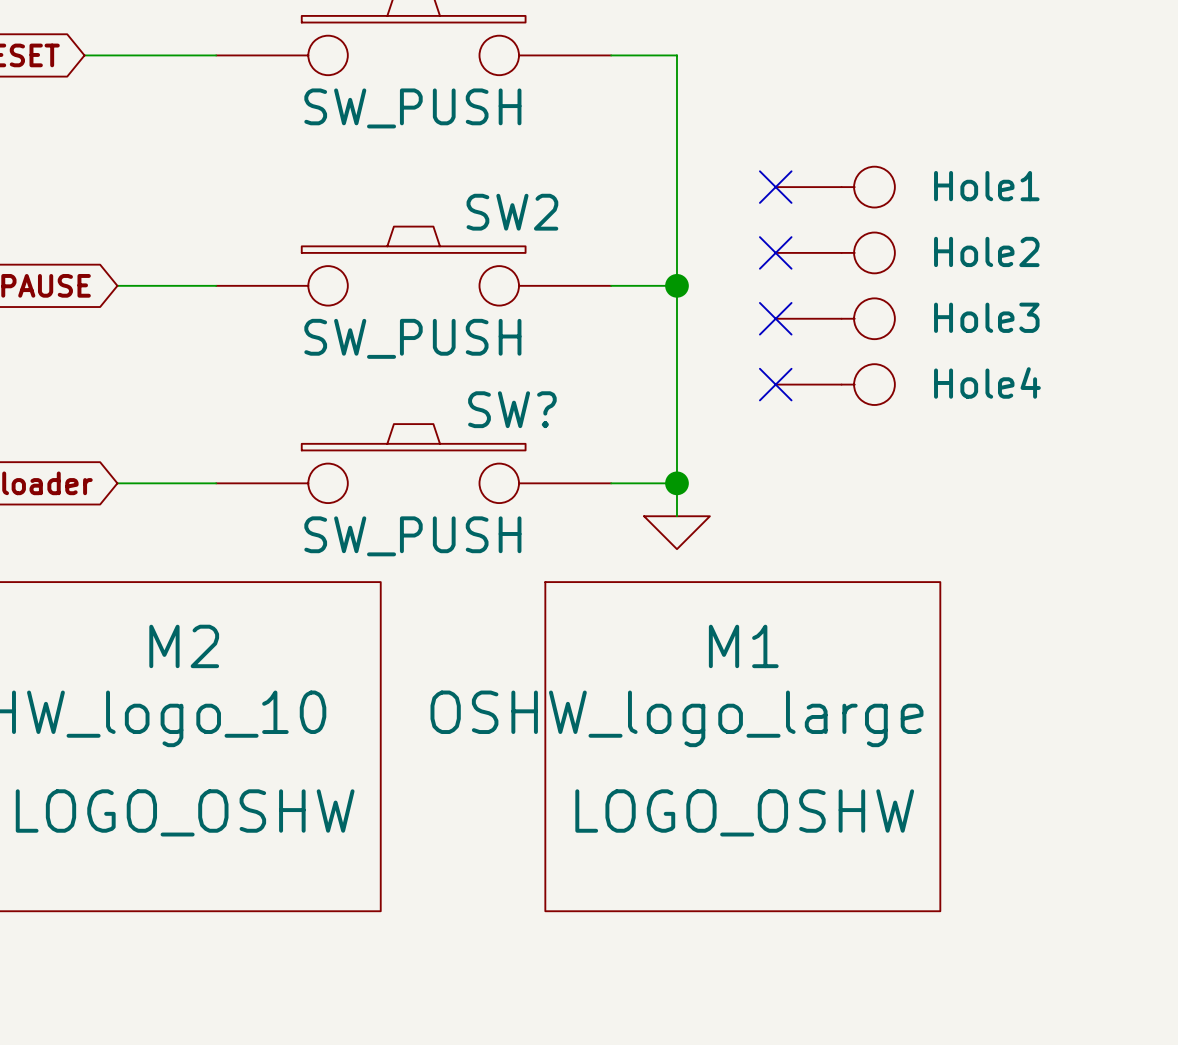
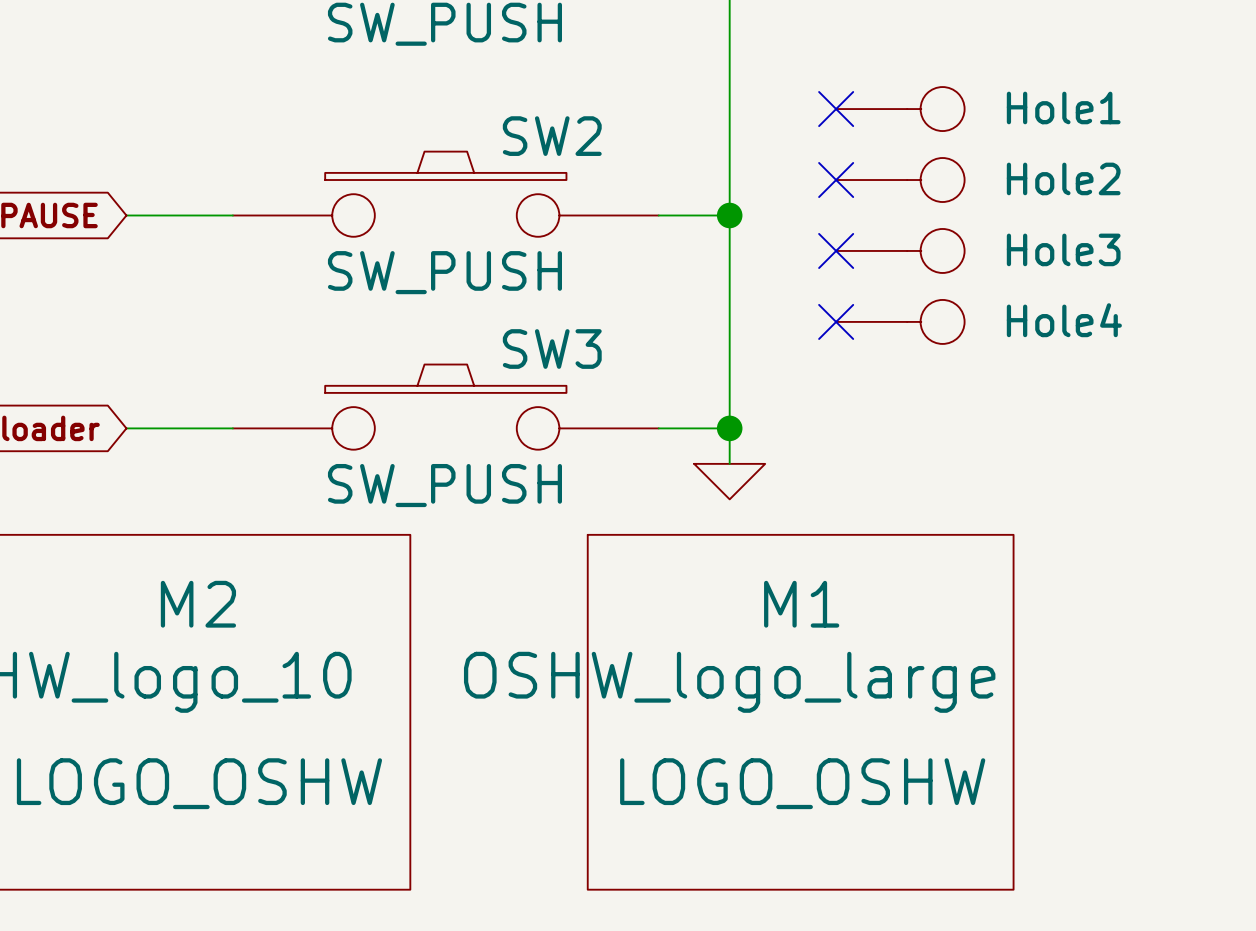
SW? name: SW? (512, 409) -> SW3 (552, 349)

